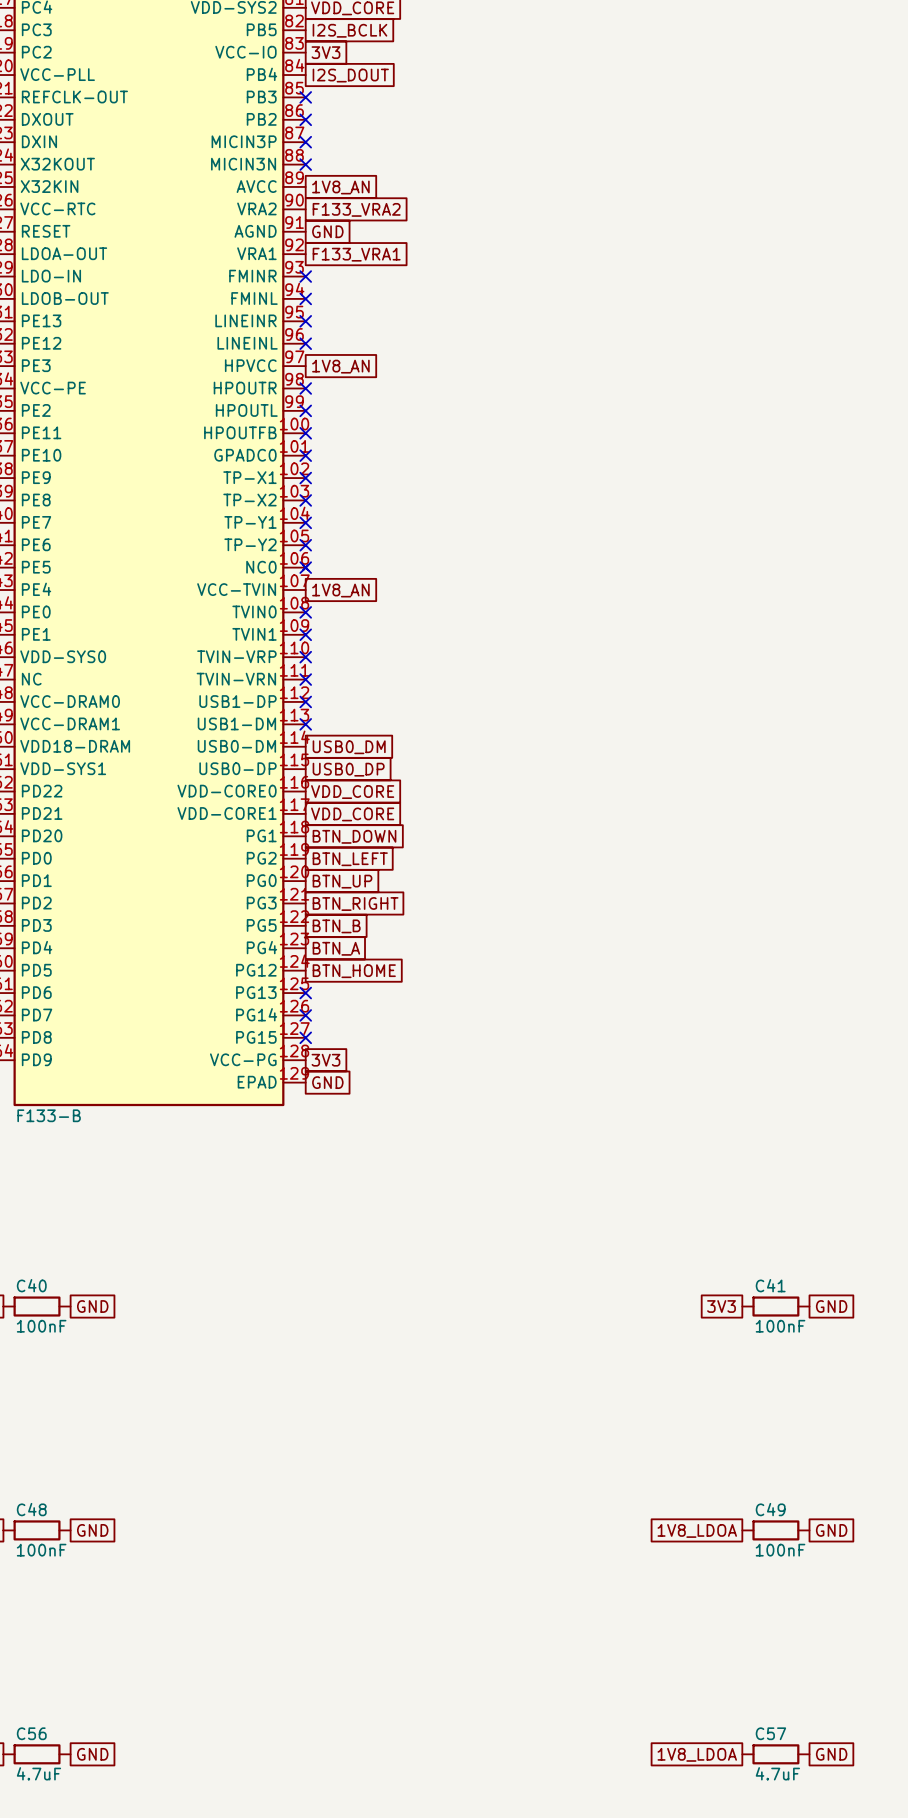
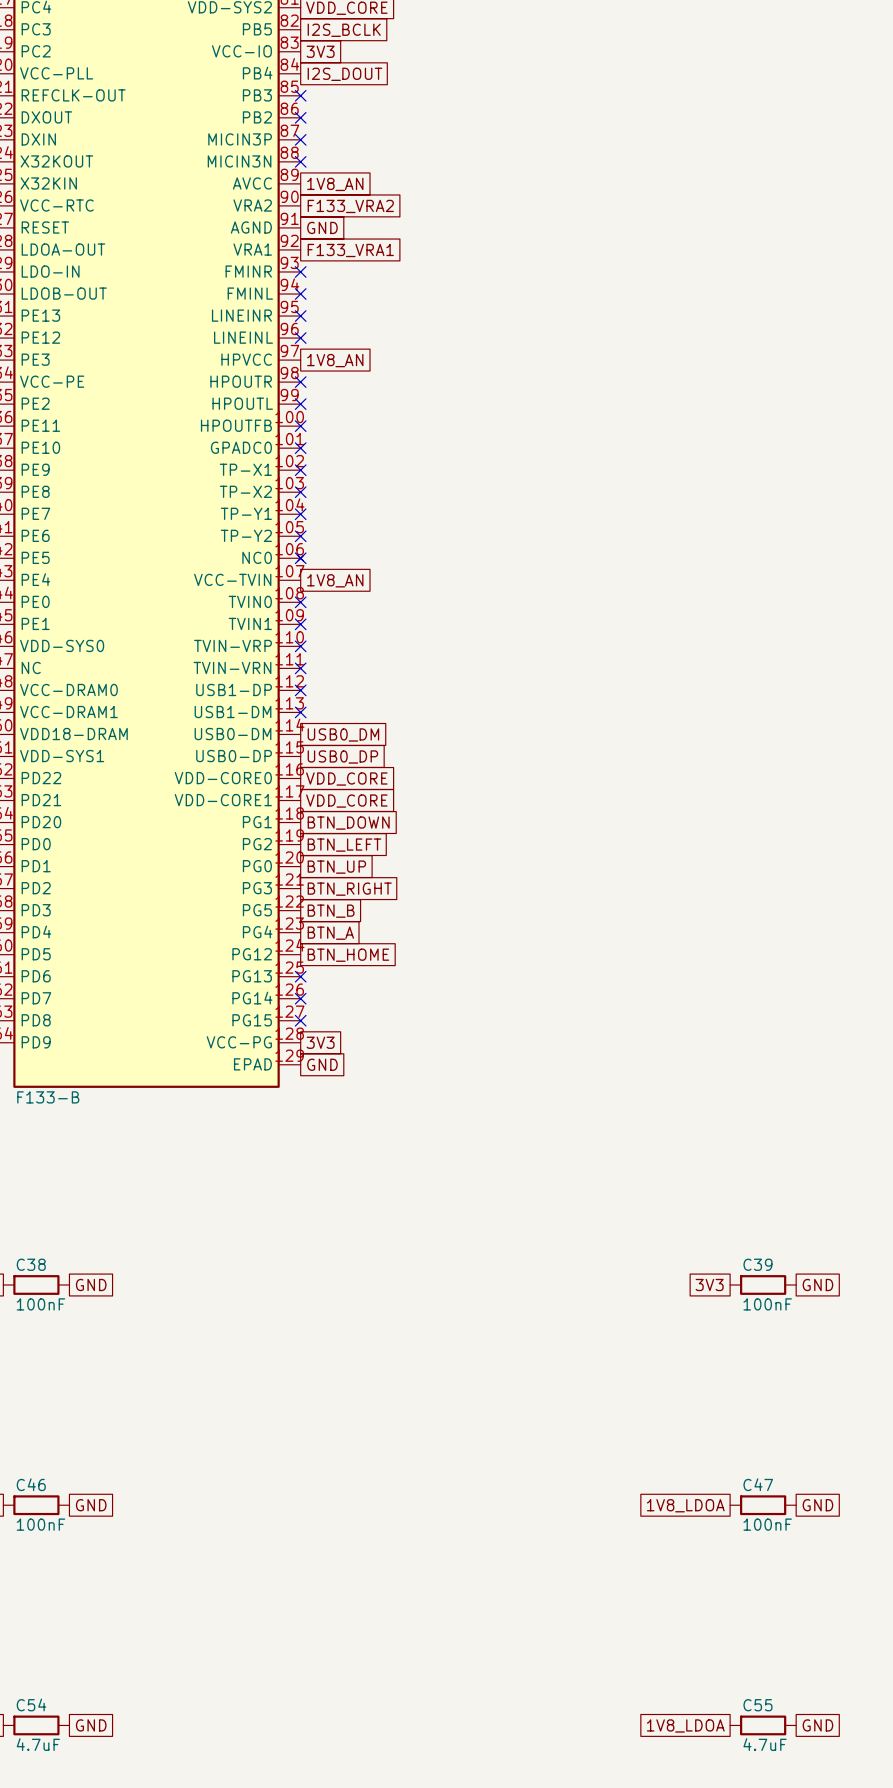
C40 name: C40 (31, 1285) -> C38 (31, 1264)
C41 name: C41 (770, 1285) -> C39 (757, 1264)
C48 name: C48 (31, 1509) -> C46 (31, 1484)
C49 name: C49 (770, 1509) -> C47 (758, 1484)
C56 name: C56 (31, 1733) -> C54 (31, 1704)
C57 name: C57 (770, 1733) -> C55 (757, 1705)

